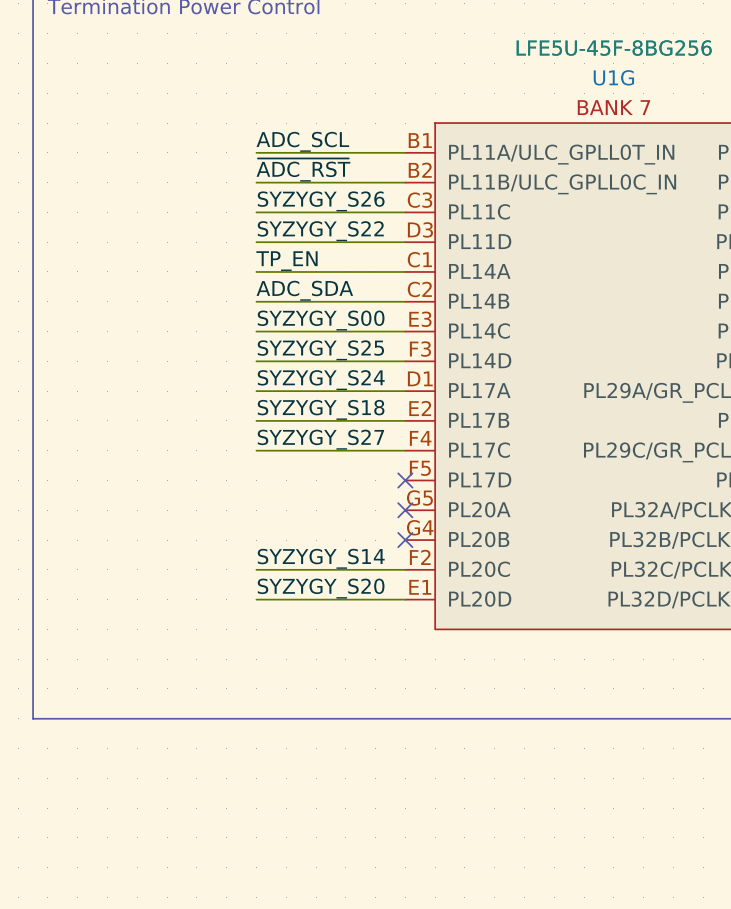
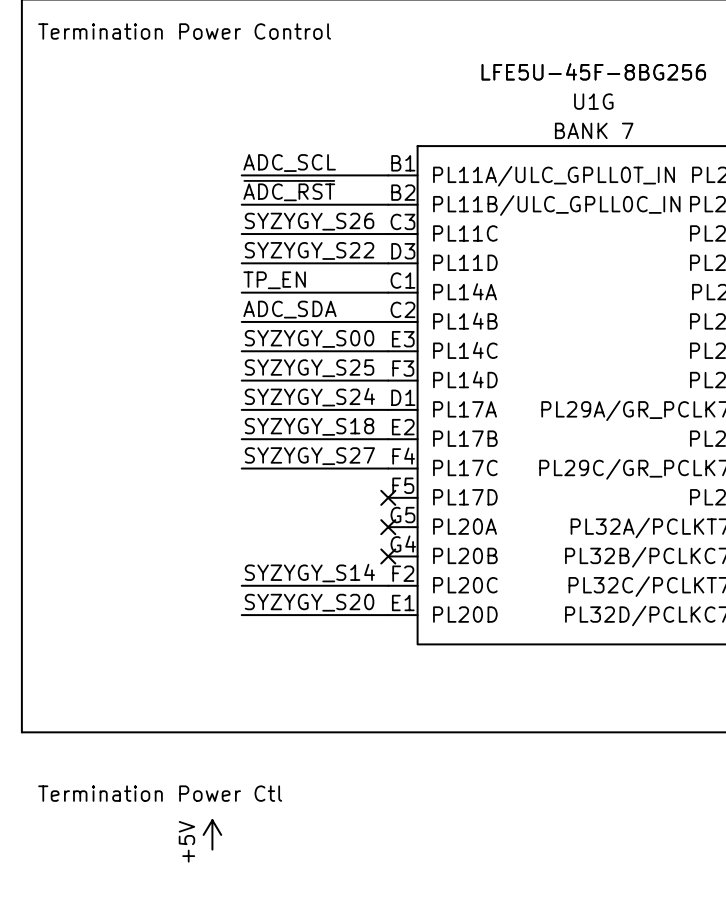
text: none -> Termination Power Ctl (160, 793)
power symbol: none -> +5V (212, 834)

